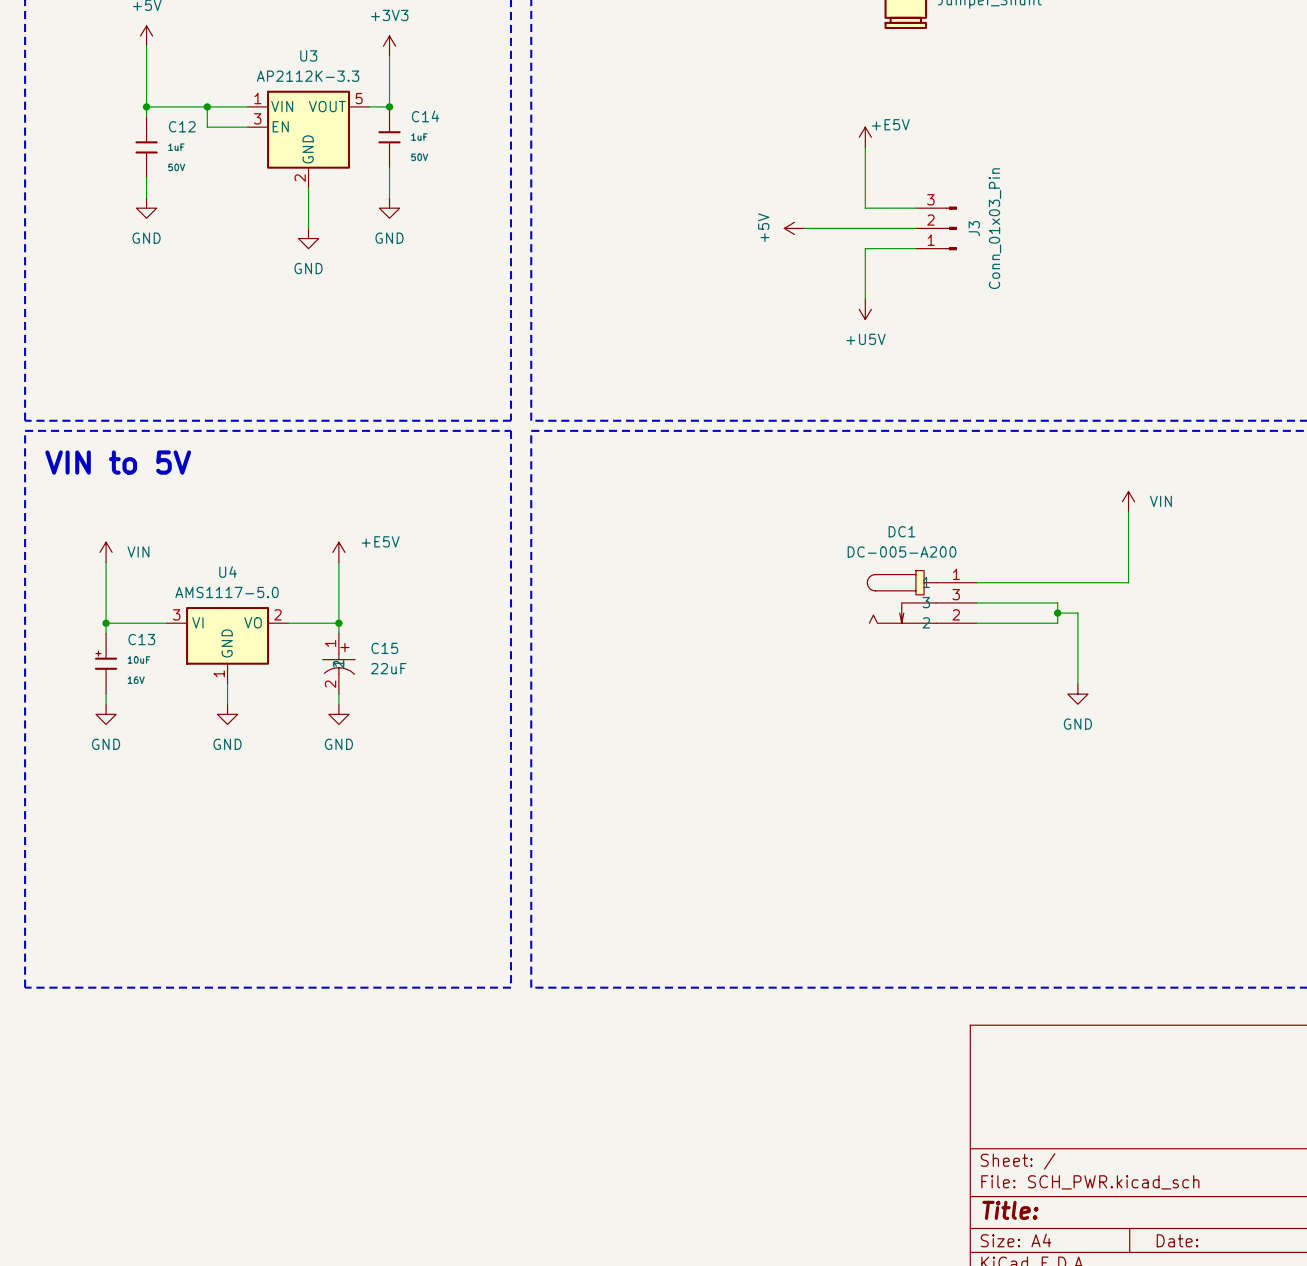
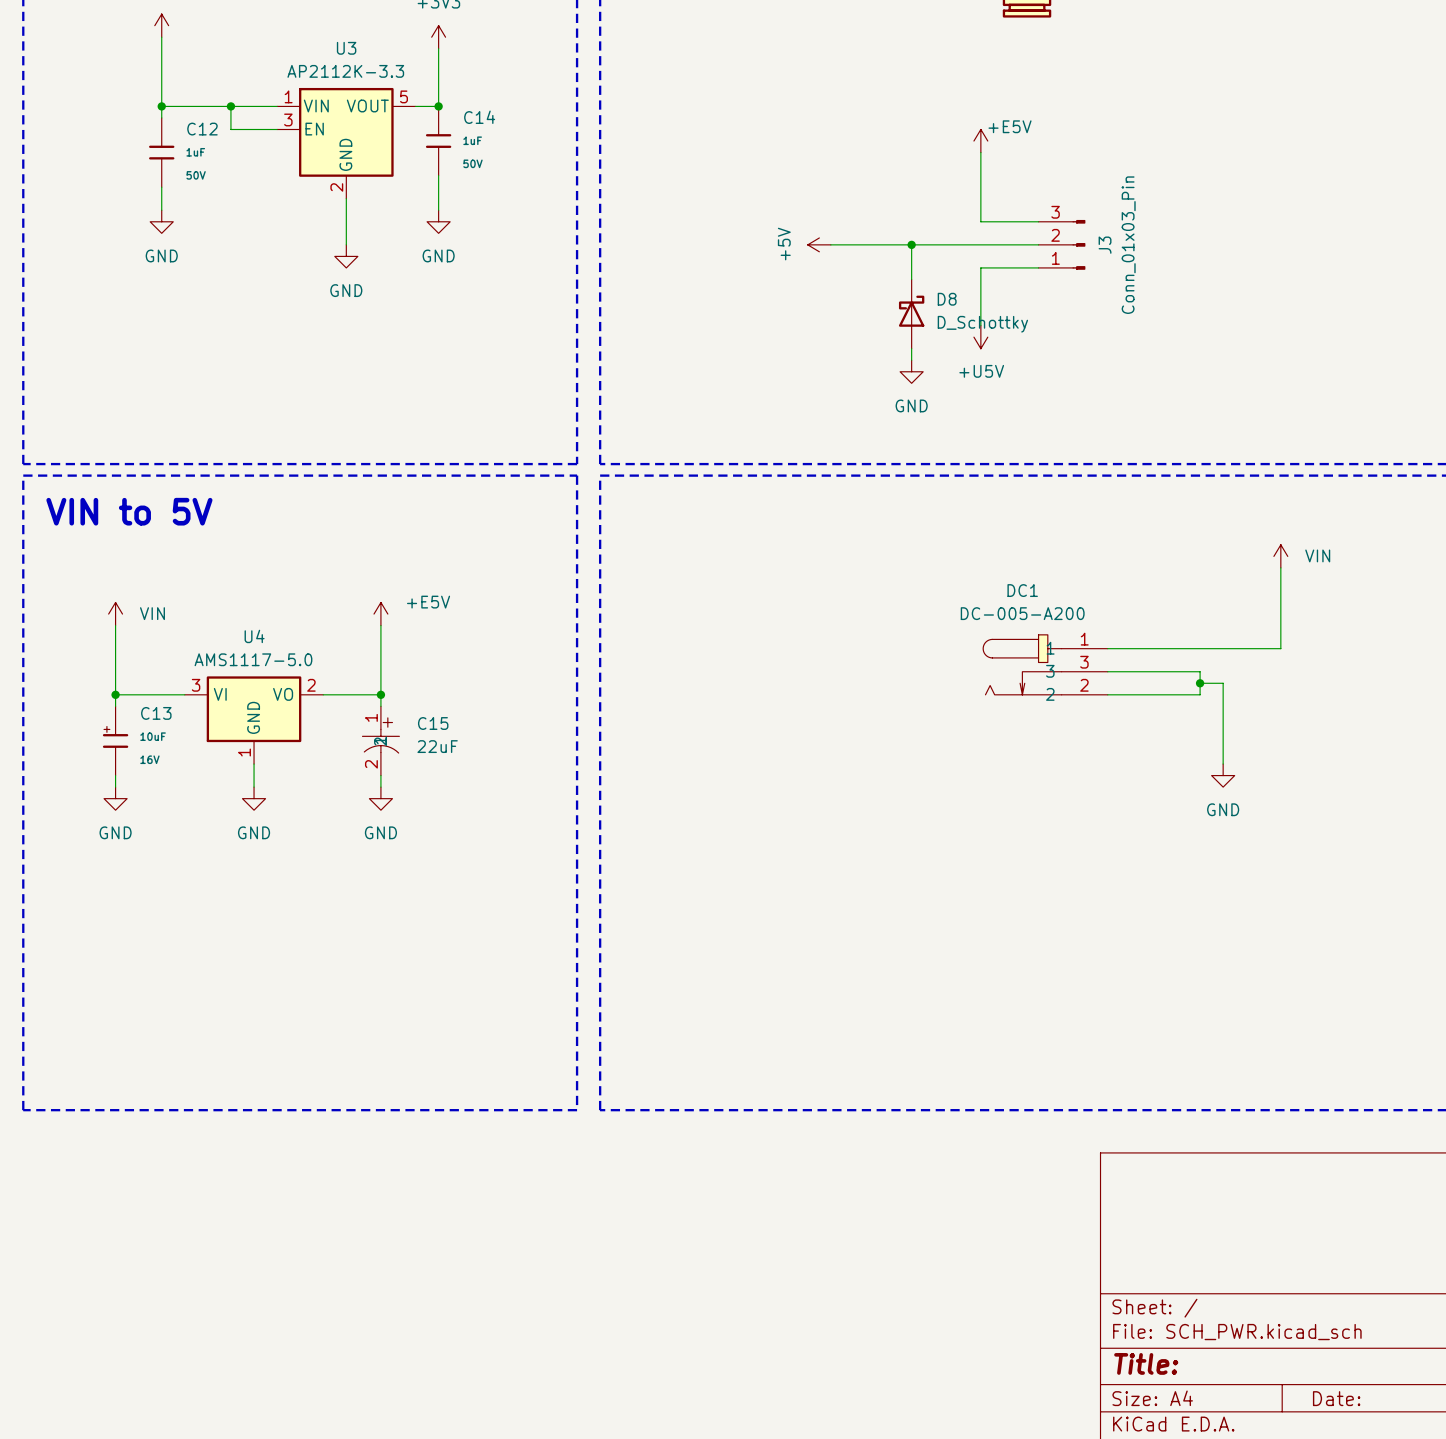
wire: none -> (830, 244) (911, 244) (911, 279)
power symbol position: +5V (794, 228) -> +5V (819, 244)
junction: none -> (911, 244)
D8: none -> D_Schottky (911, 314)
wire: none -> (911, 348) (911, 360)
power symbol: none -> GND (911, 371)

